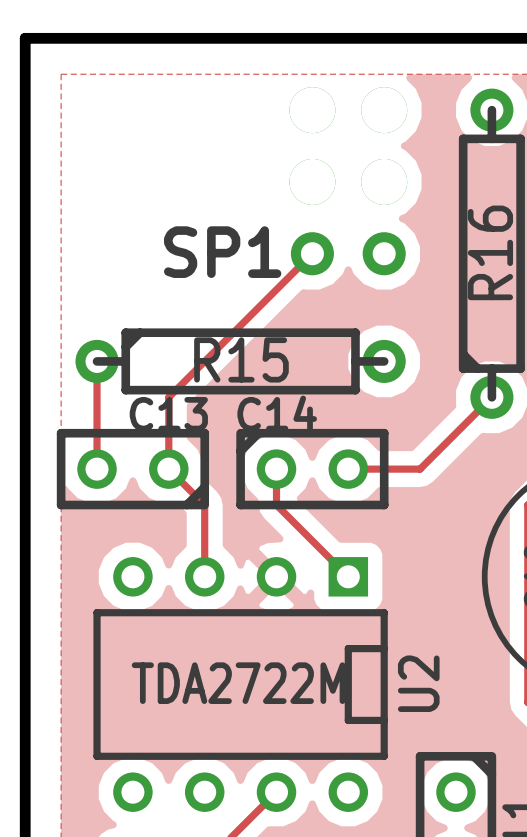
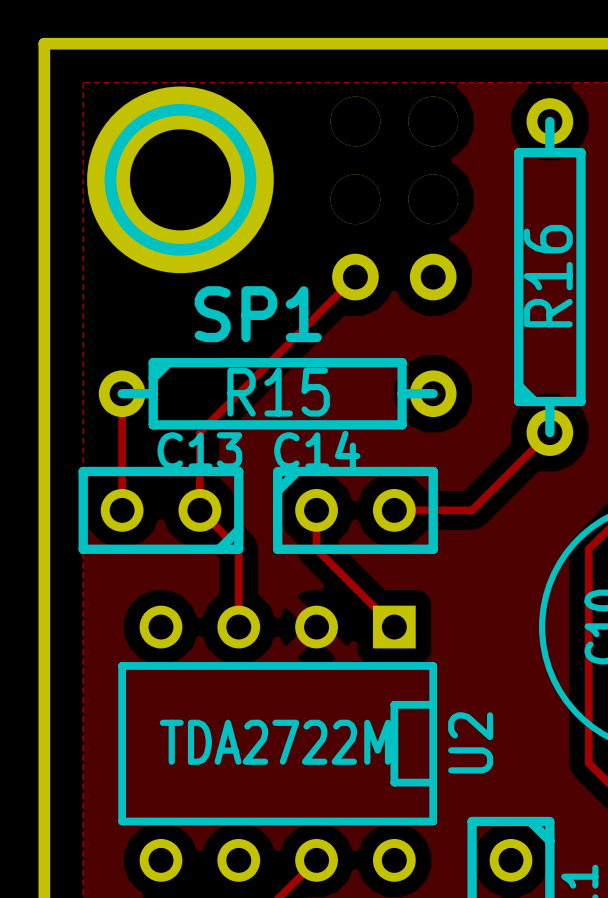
part: none -> (180, 179)
SP1 name position: SP1 (222, 252) -> SP1 (258, 314)

